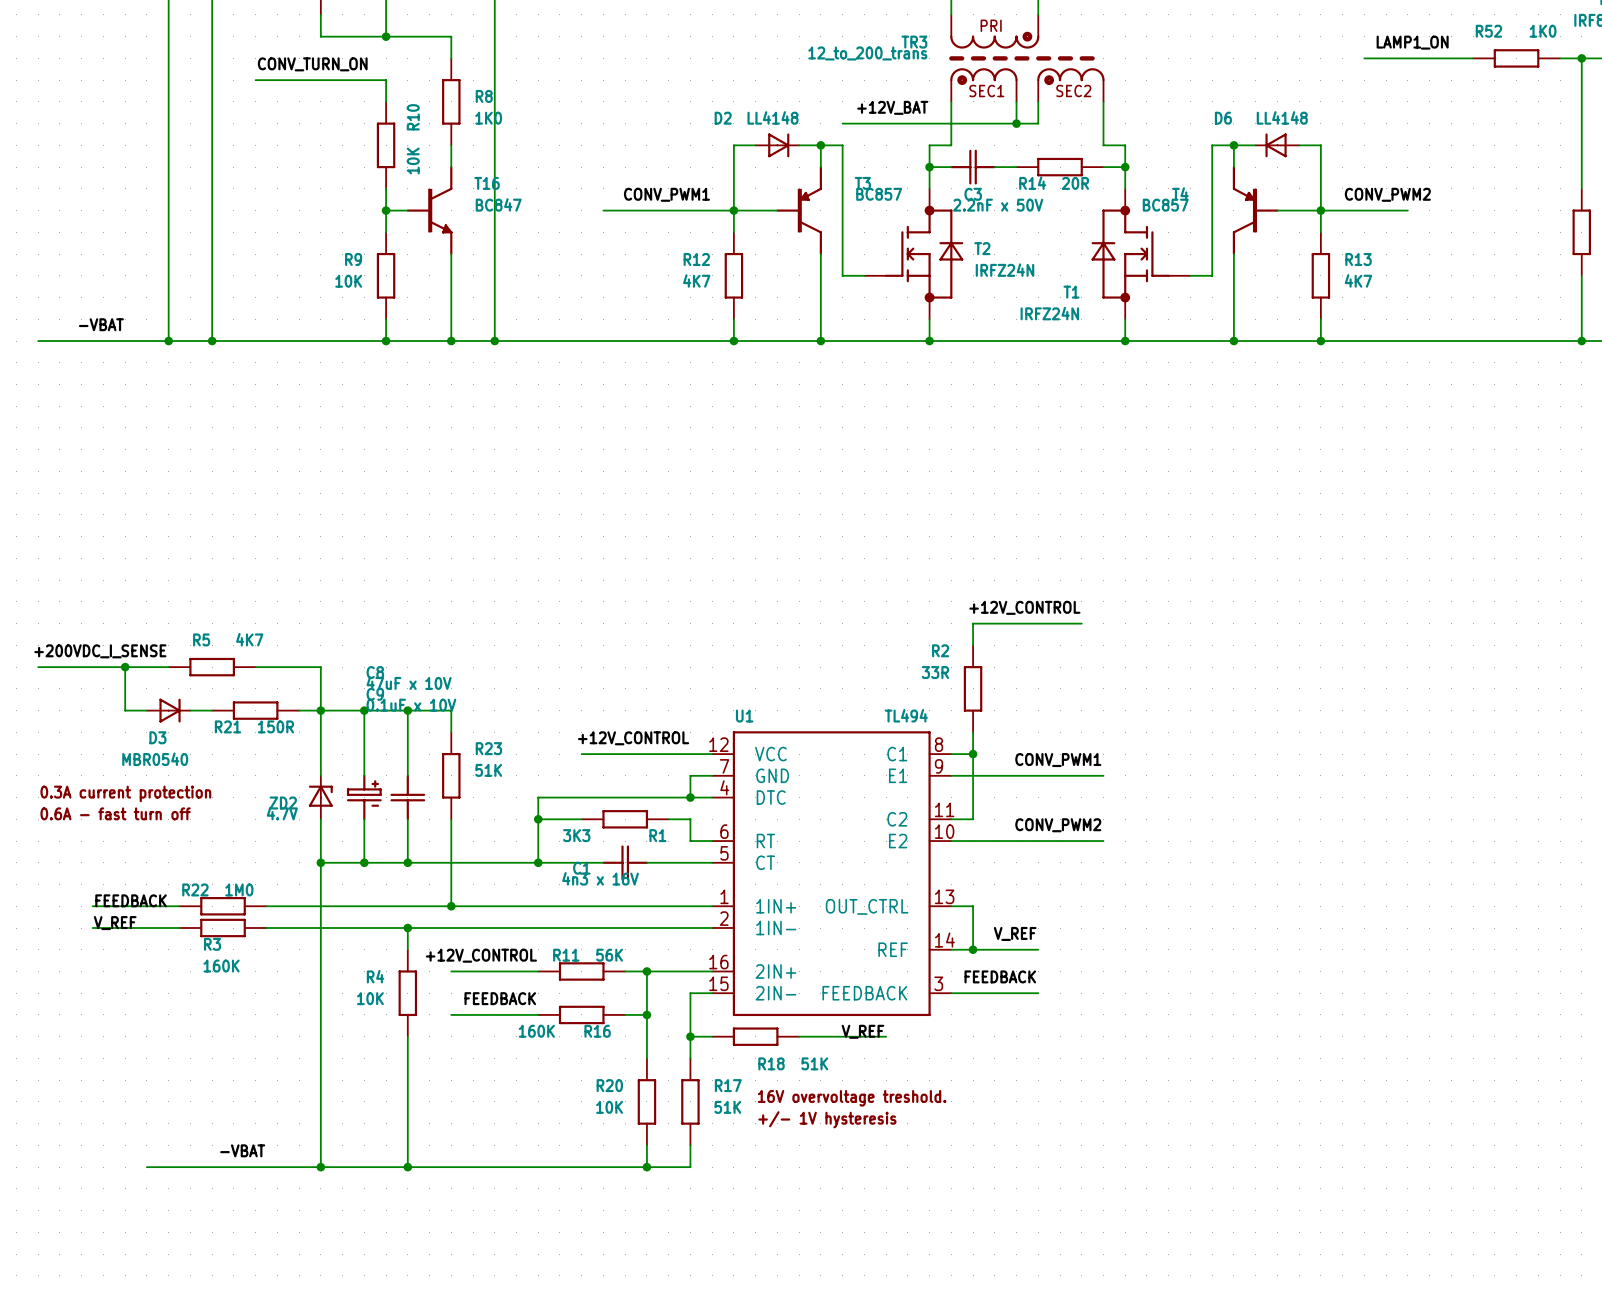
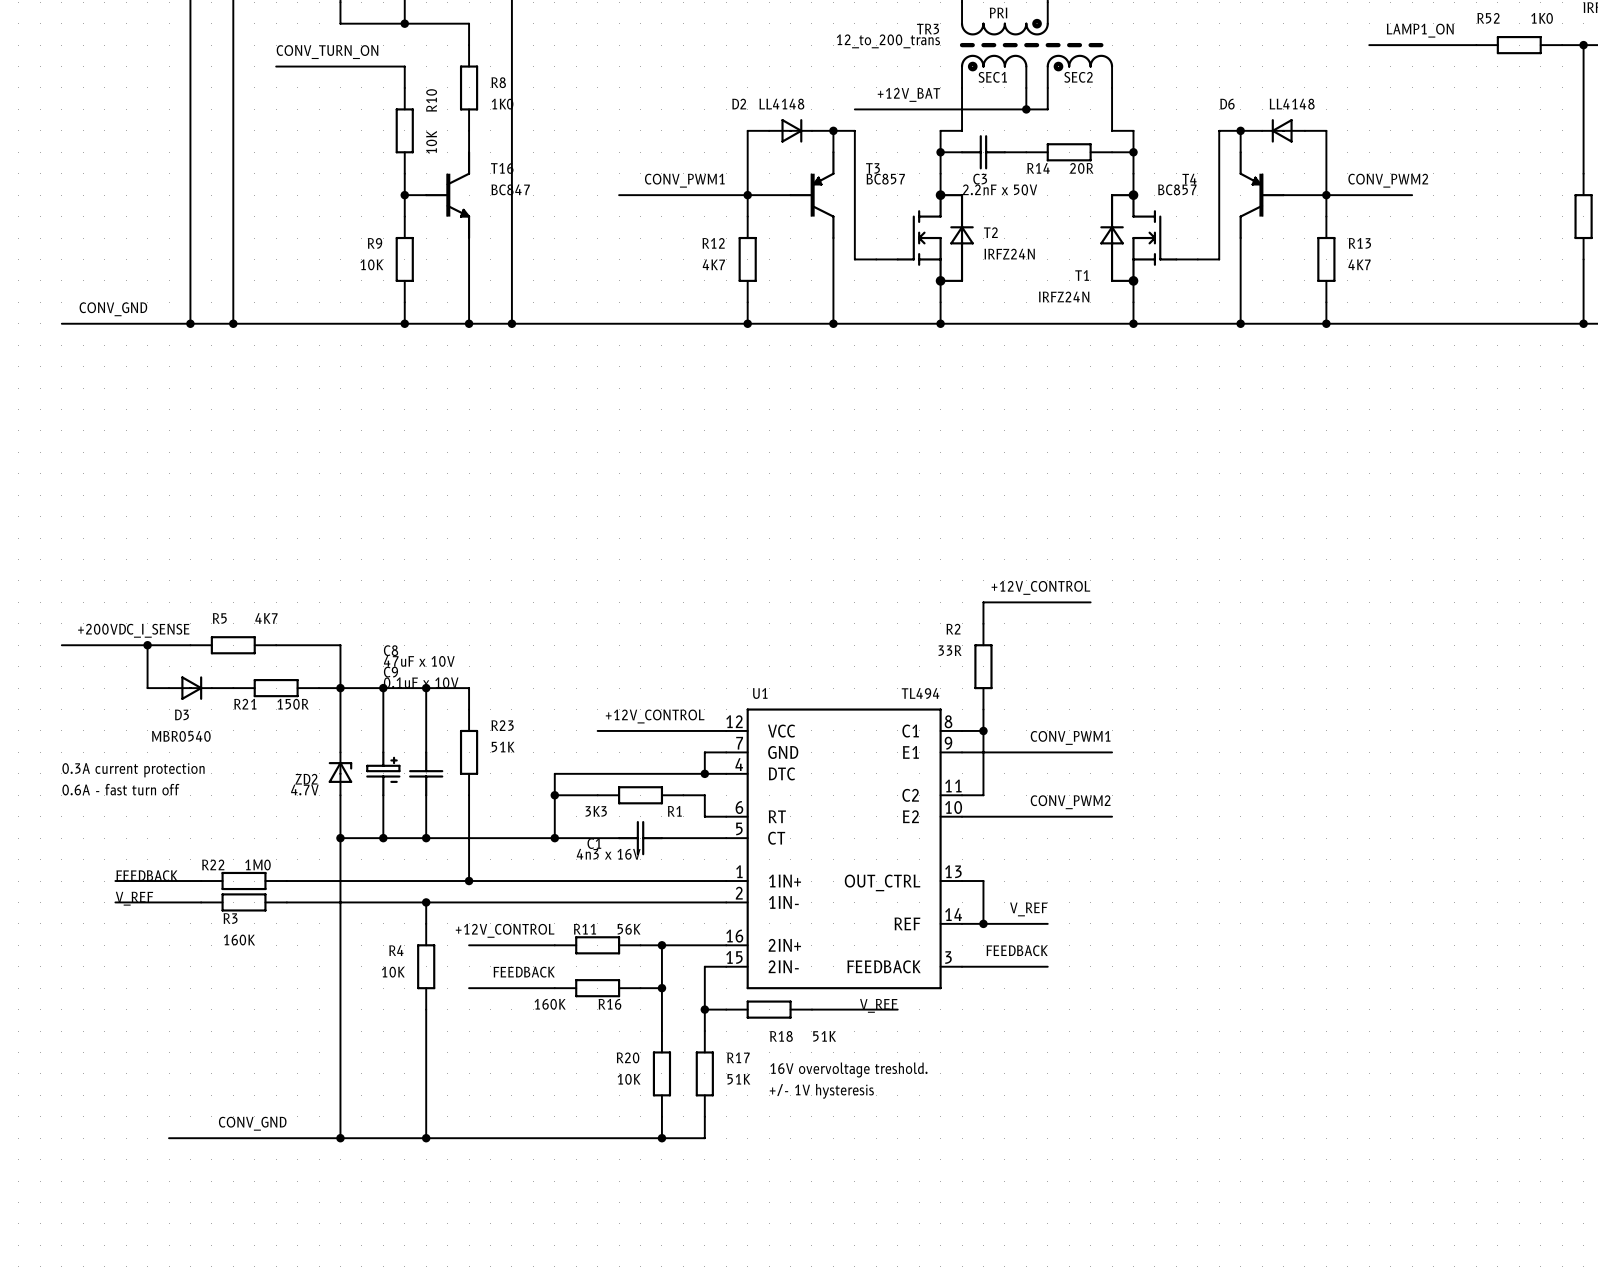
label: -VBAT (101, 324) -> CONV_GND (113, 309)
label: -VBAT (242, 1150) -> CONV_GND (252, 1123)

